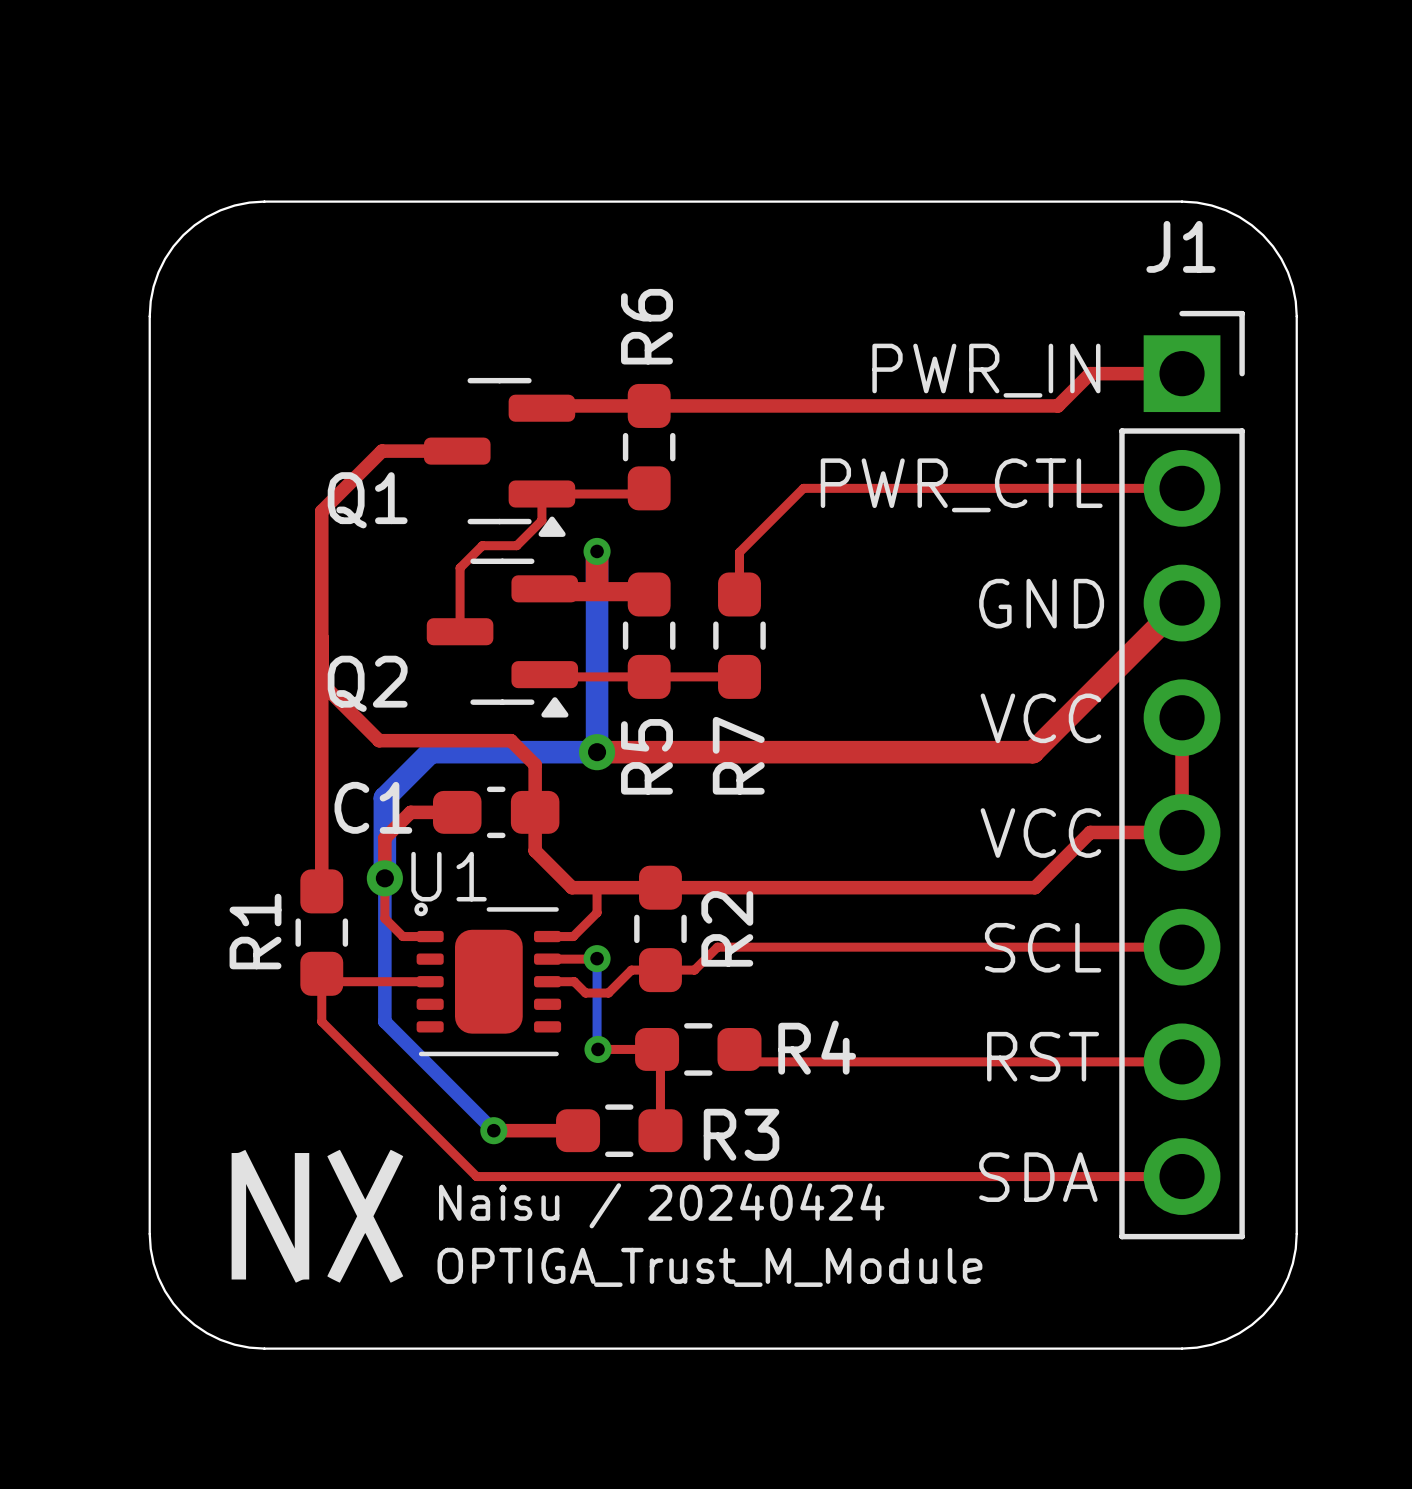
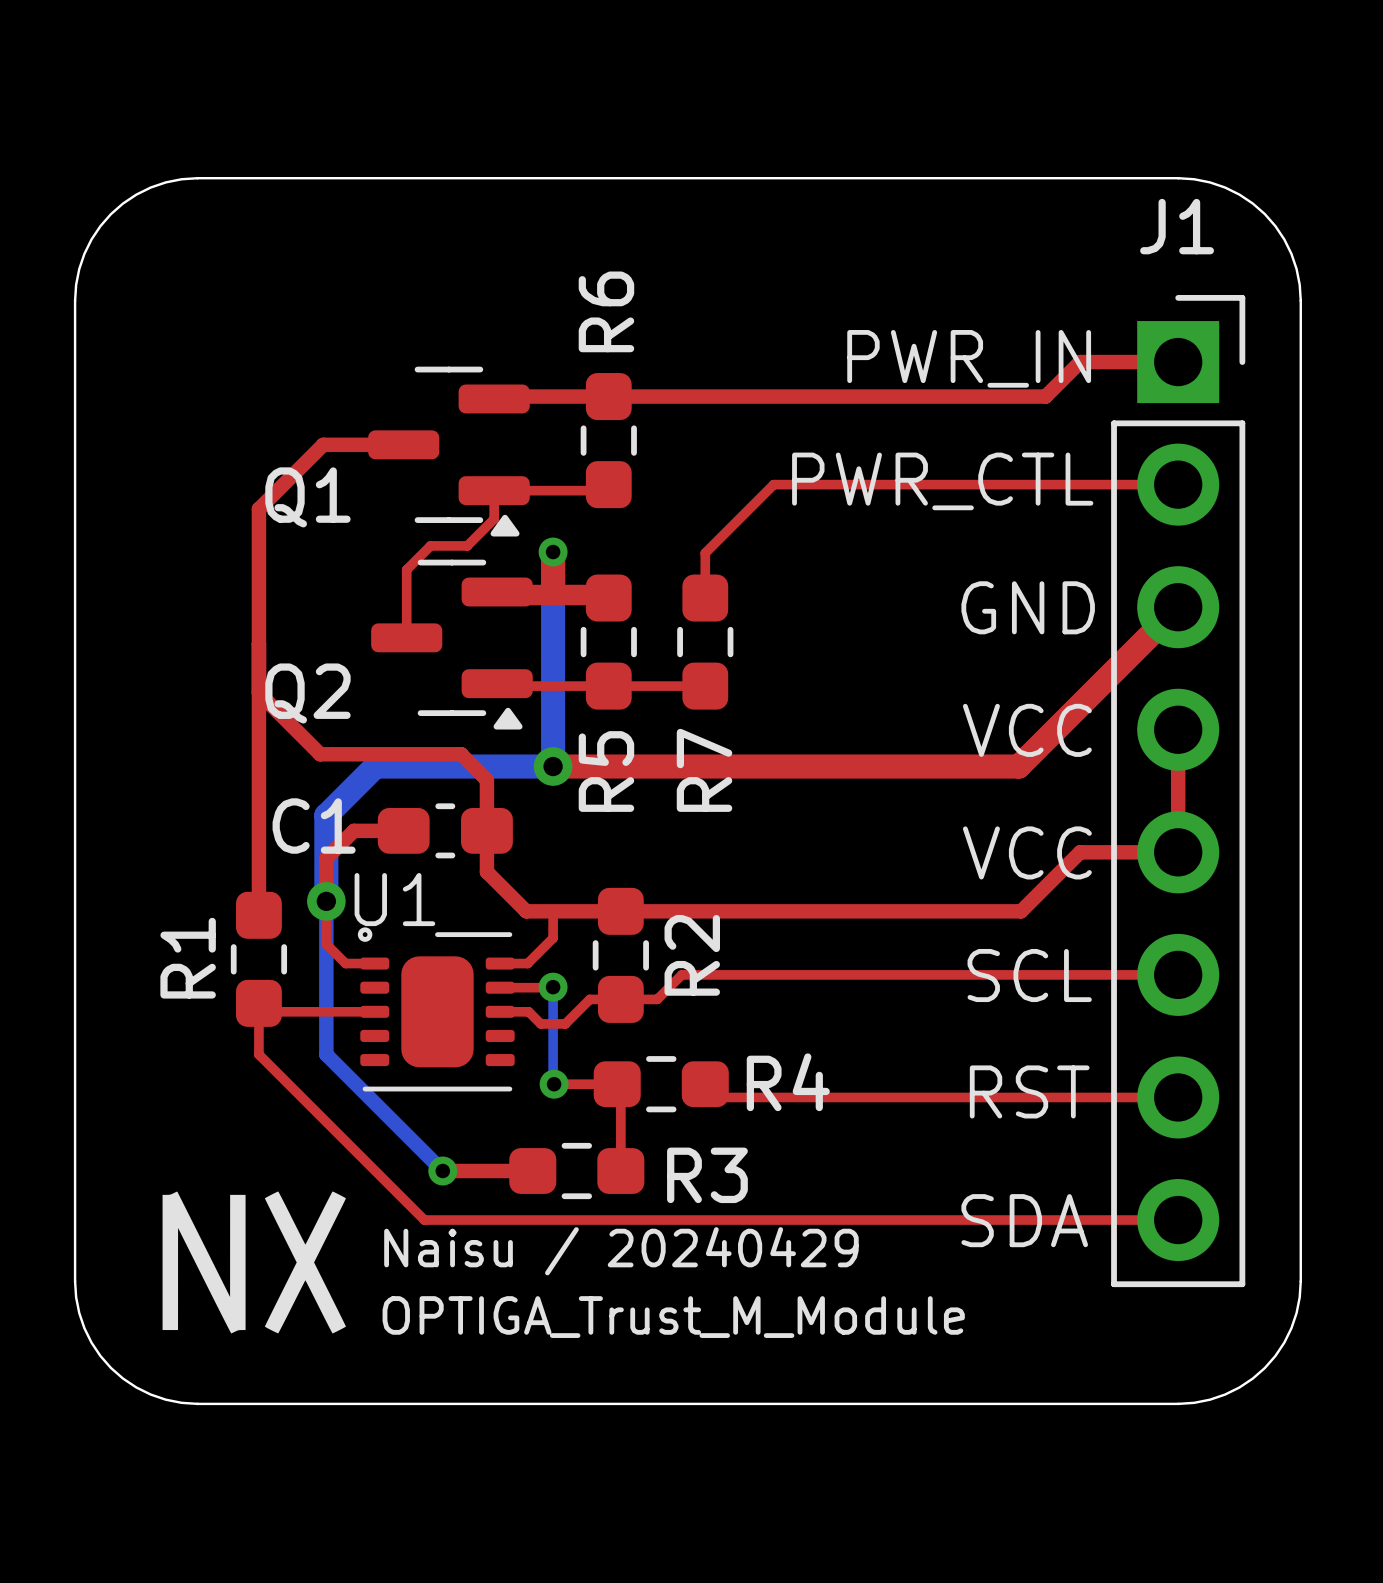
text: Naisu / 20240424 (661, 1205) -> Naisu / 20240429 (621, 1251)

